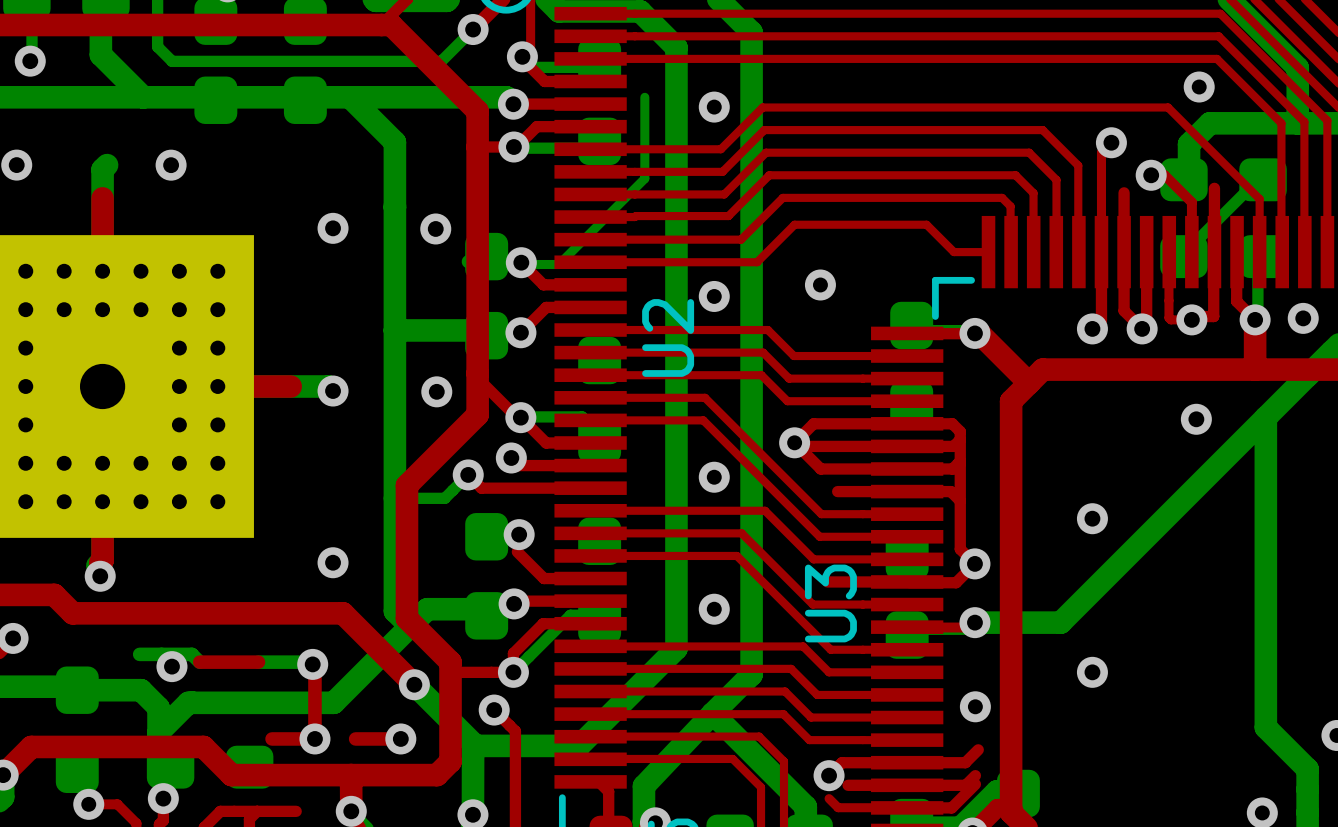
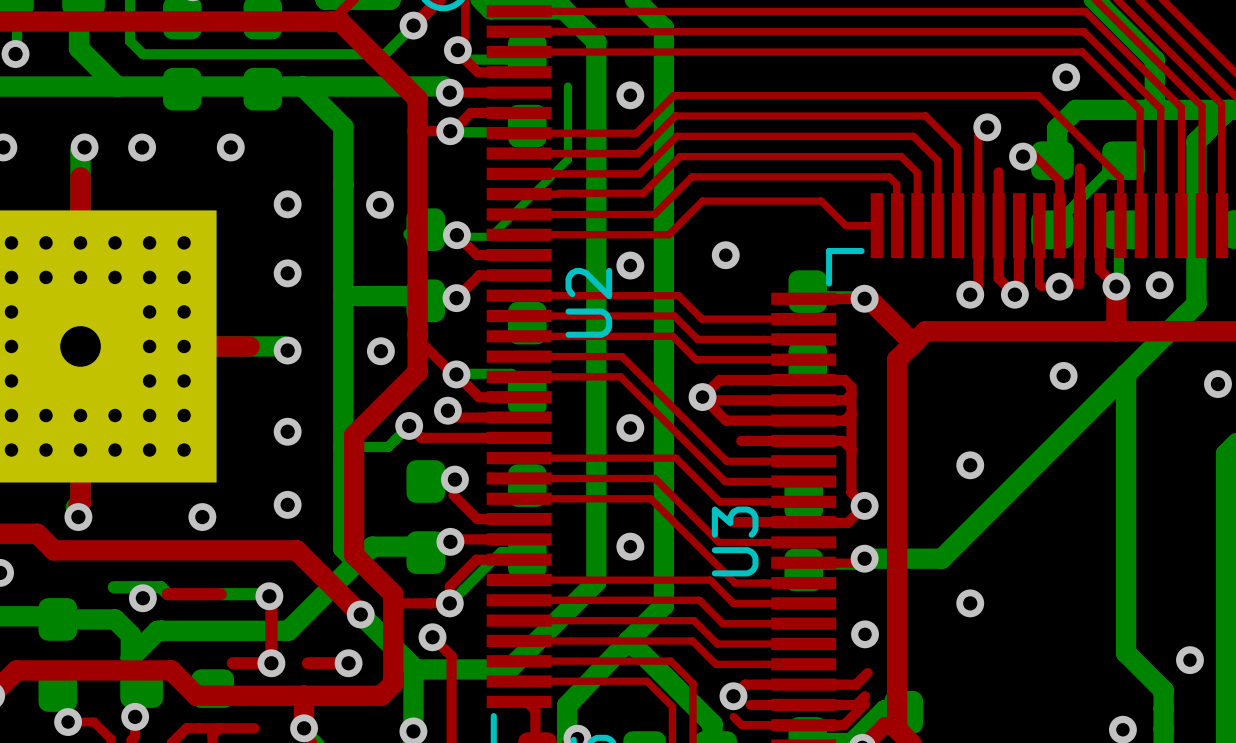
via: none -> (84, 147)
via: none -> (230, 147)
via: none -> (287, 273)
via: none -> (287, 431)
via: none -> (202, 517)

